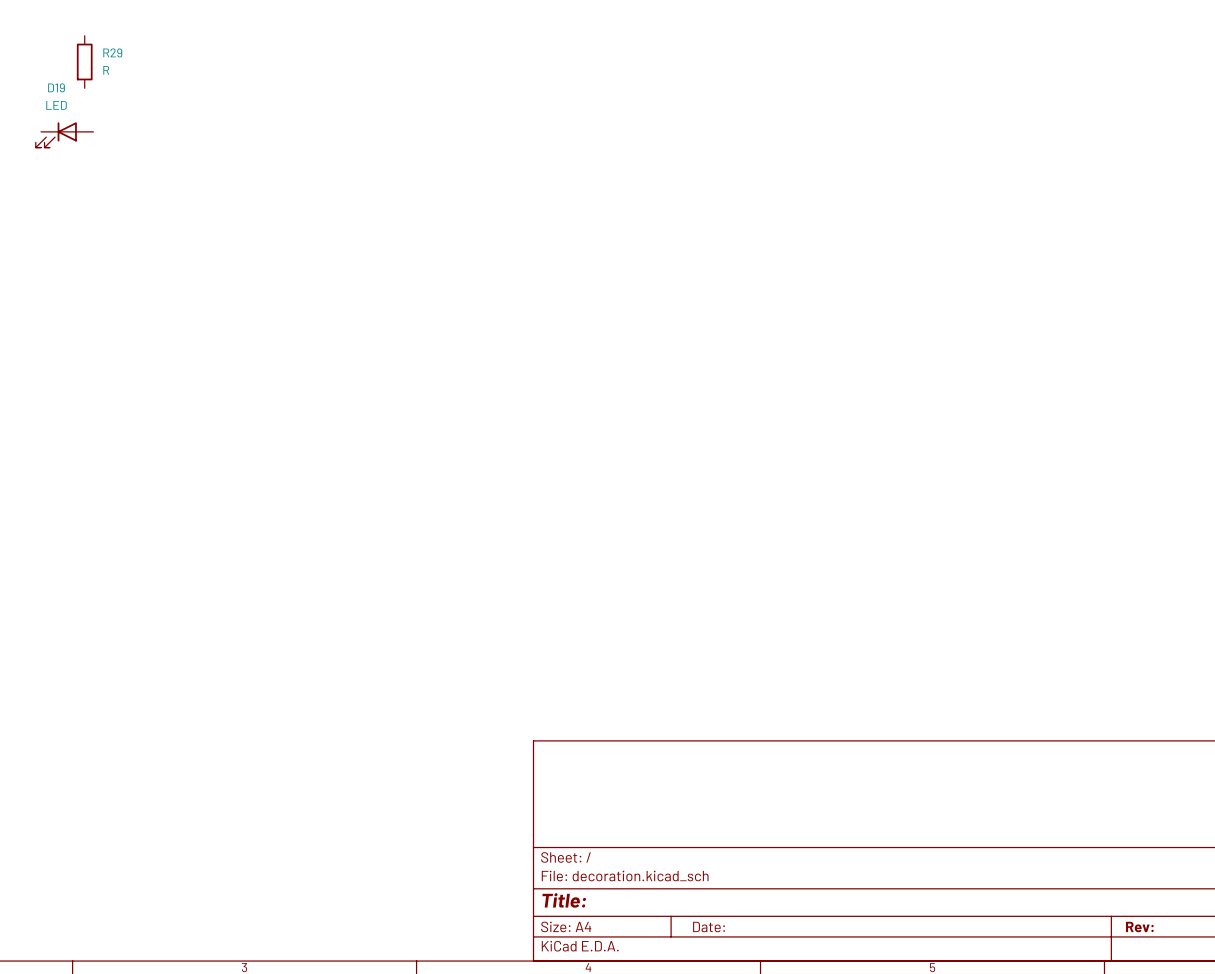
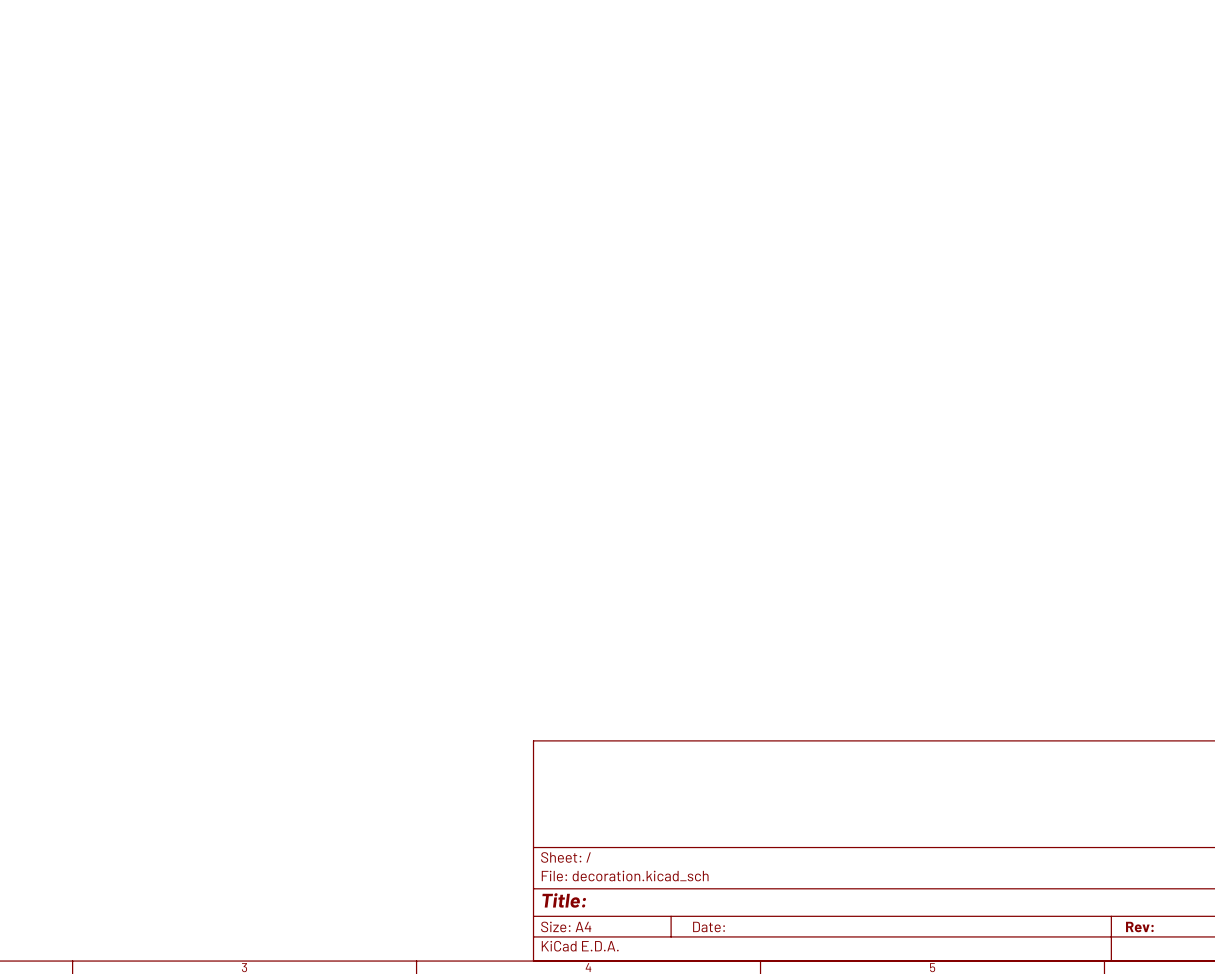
R29: R (84, 62) -> none
D19: LED (64, 134) -> none

